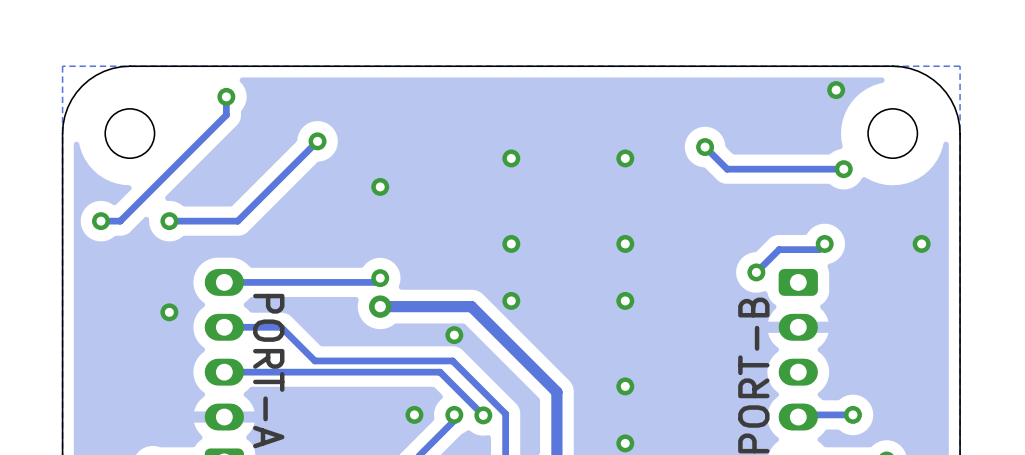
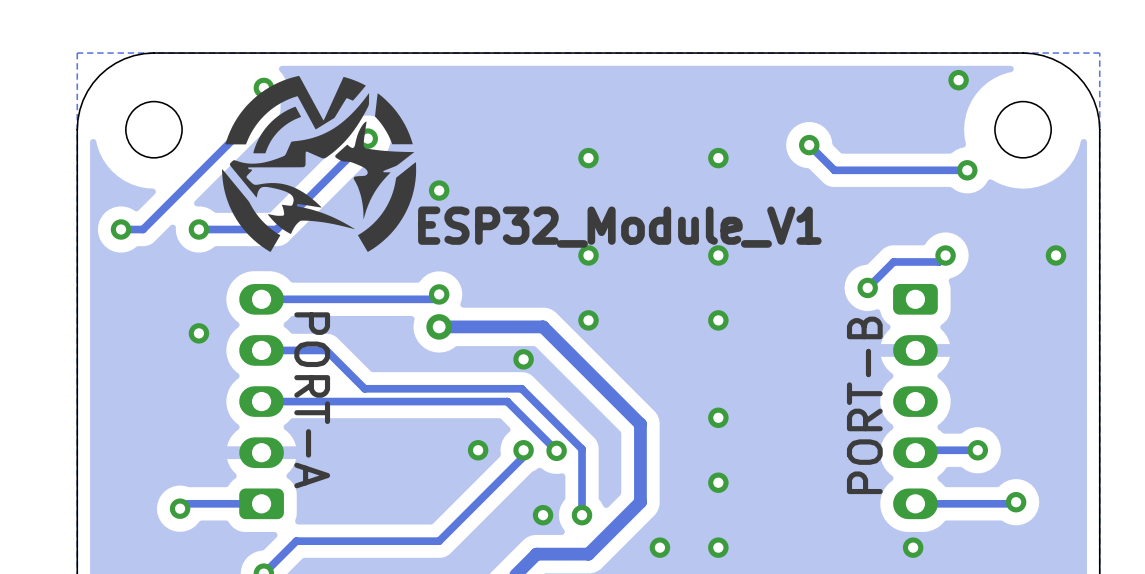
drawing: none -> [222, 75, 417, 252]
text: none -> ESP32_Module_V1 (619, 227)

